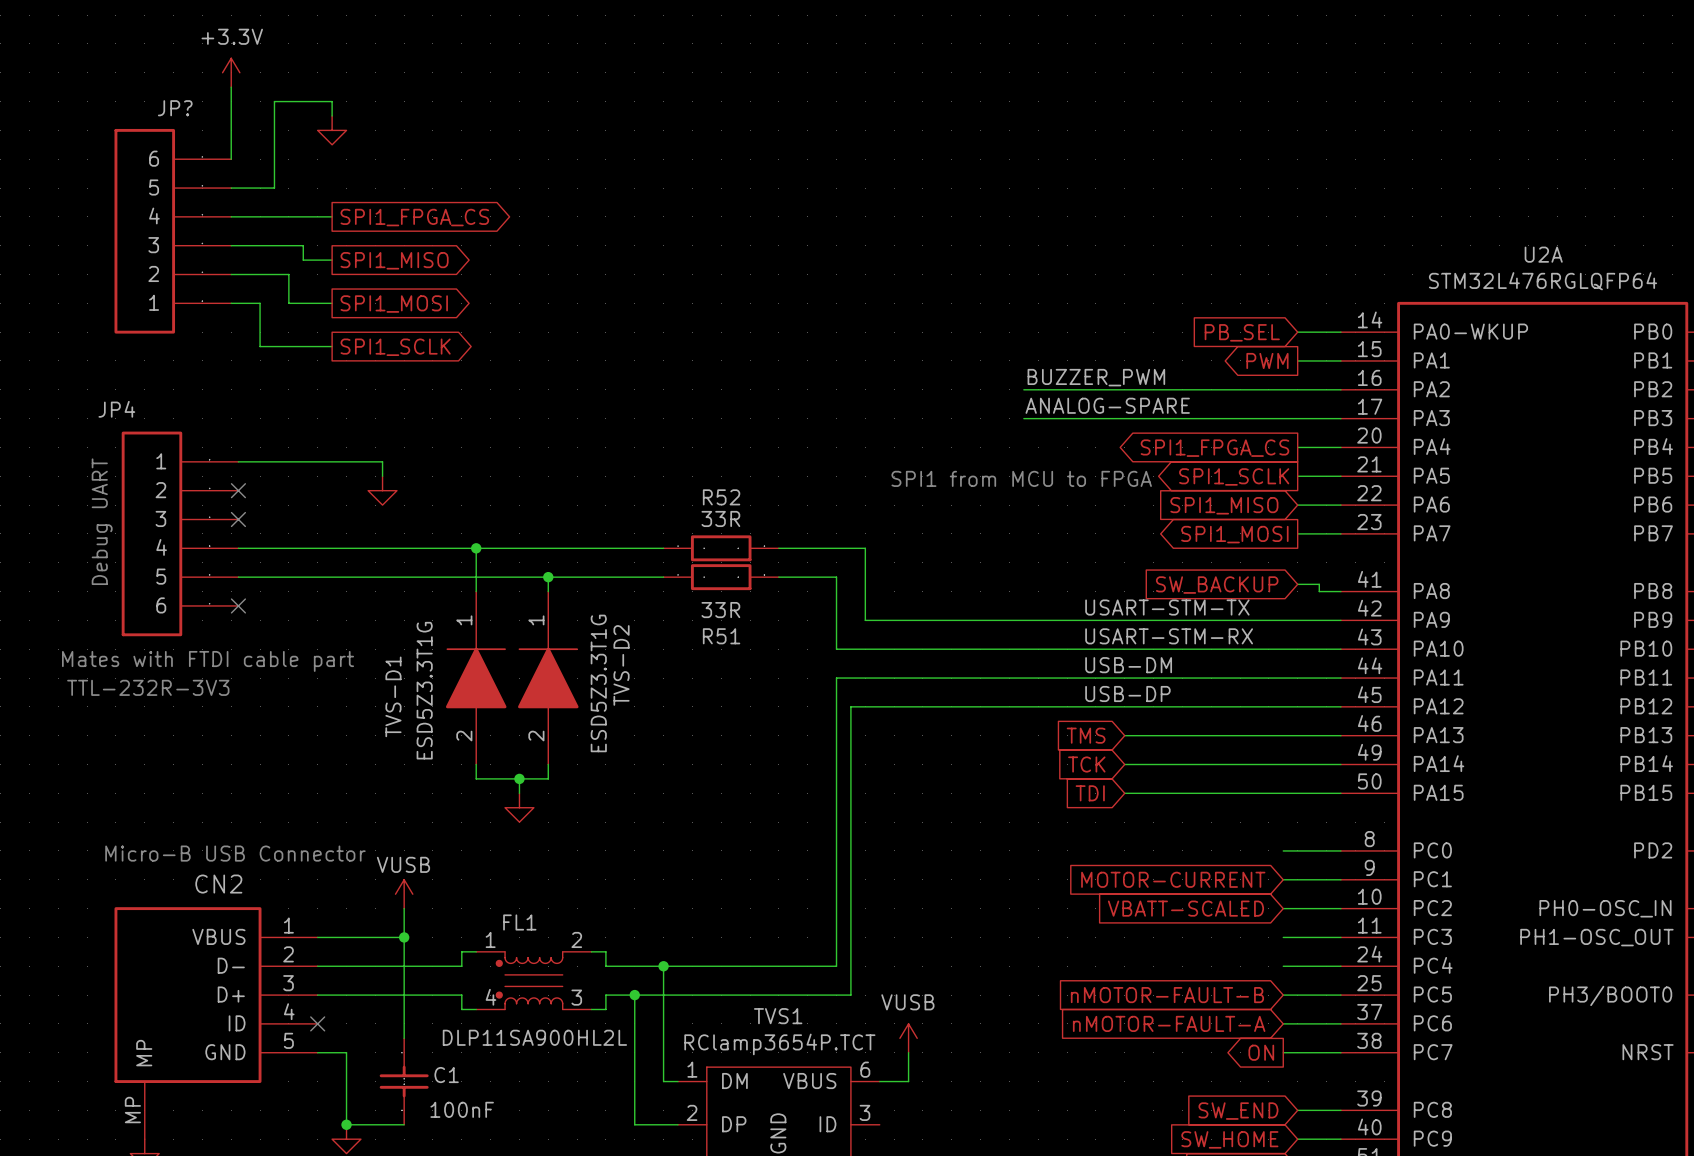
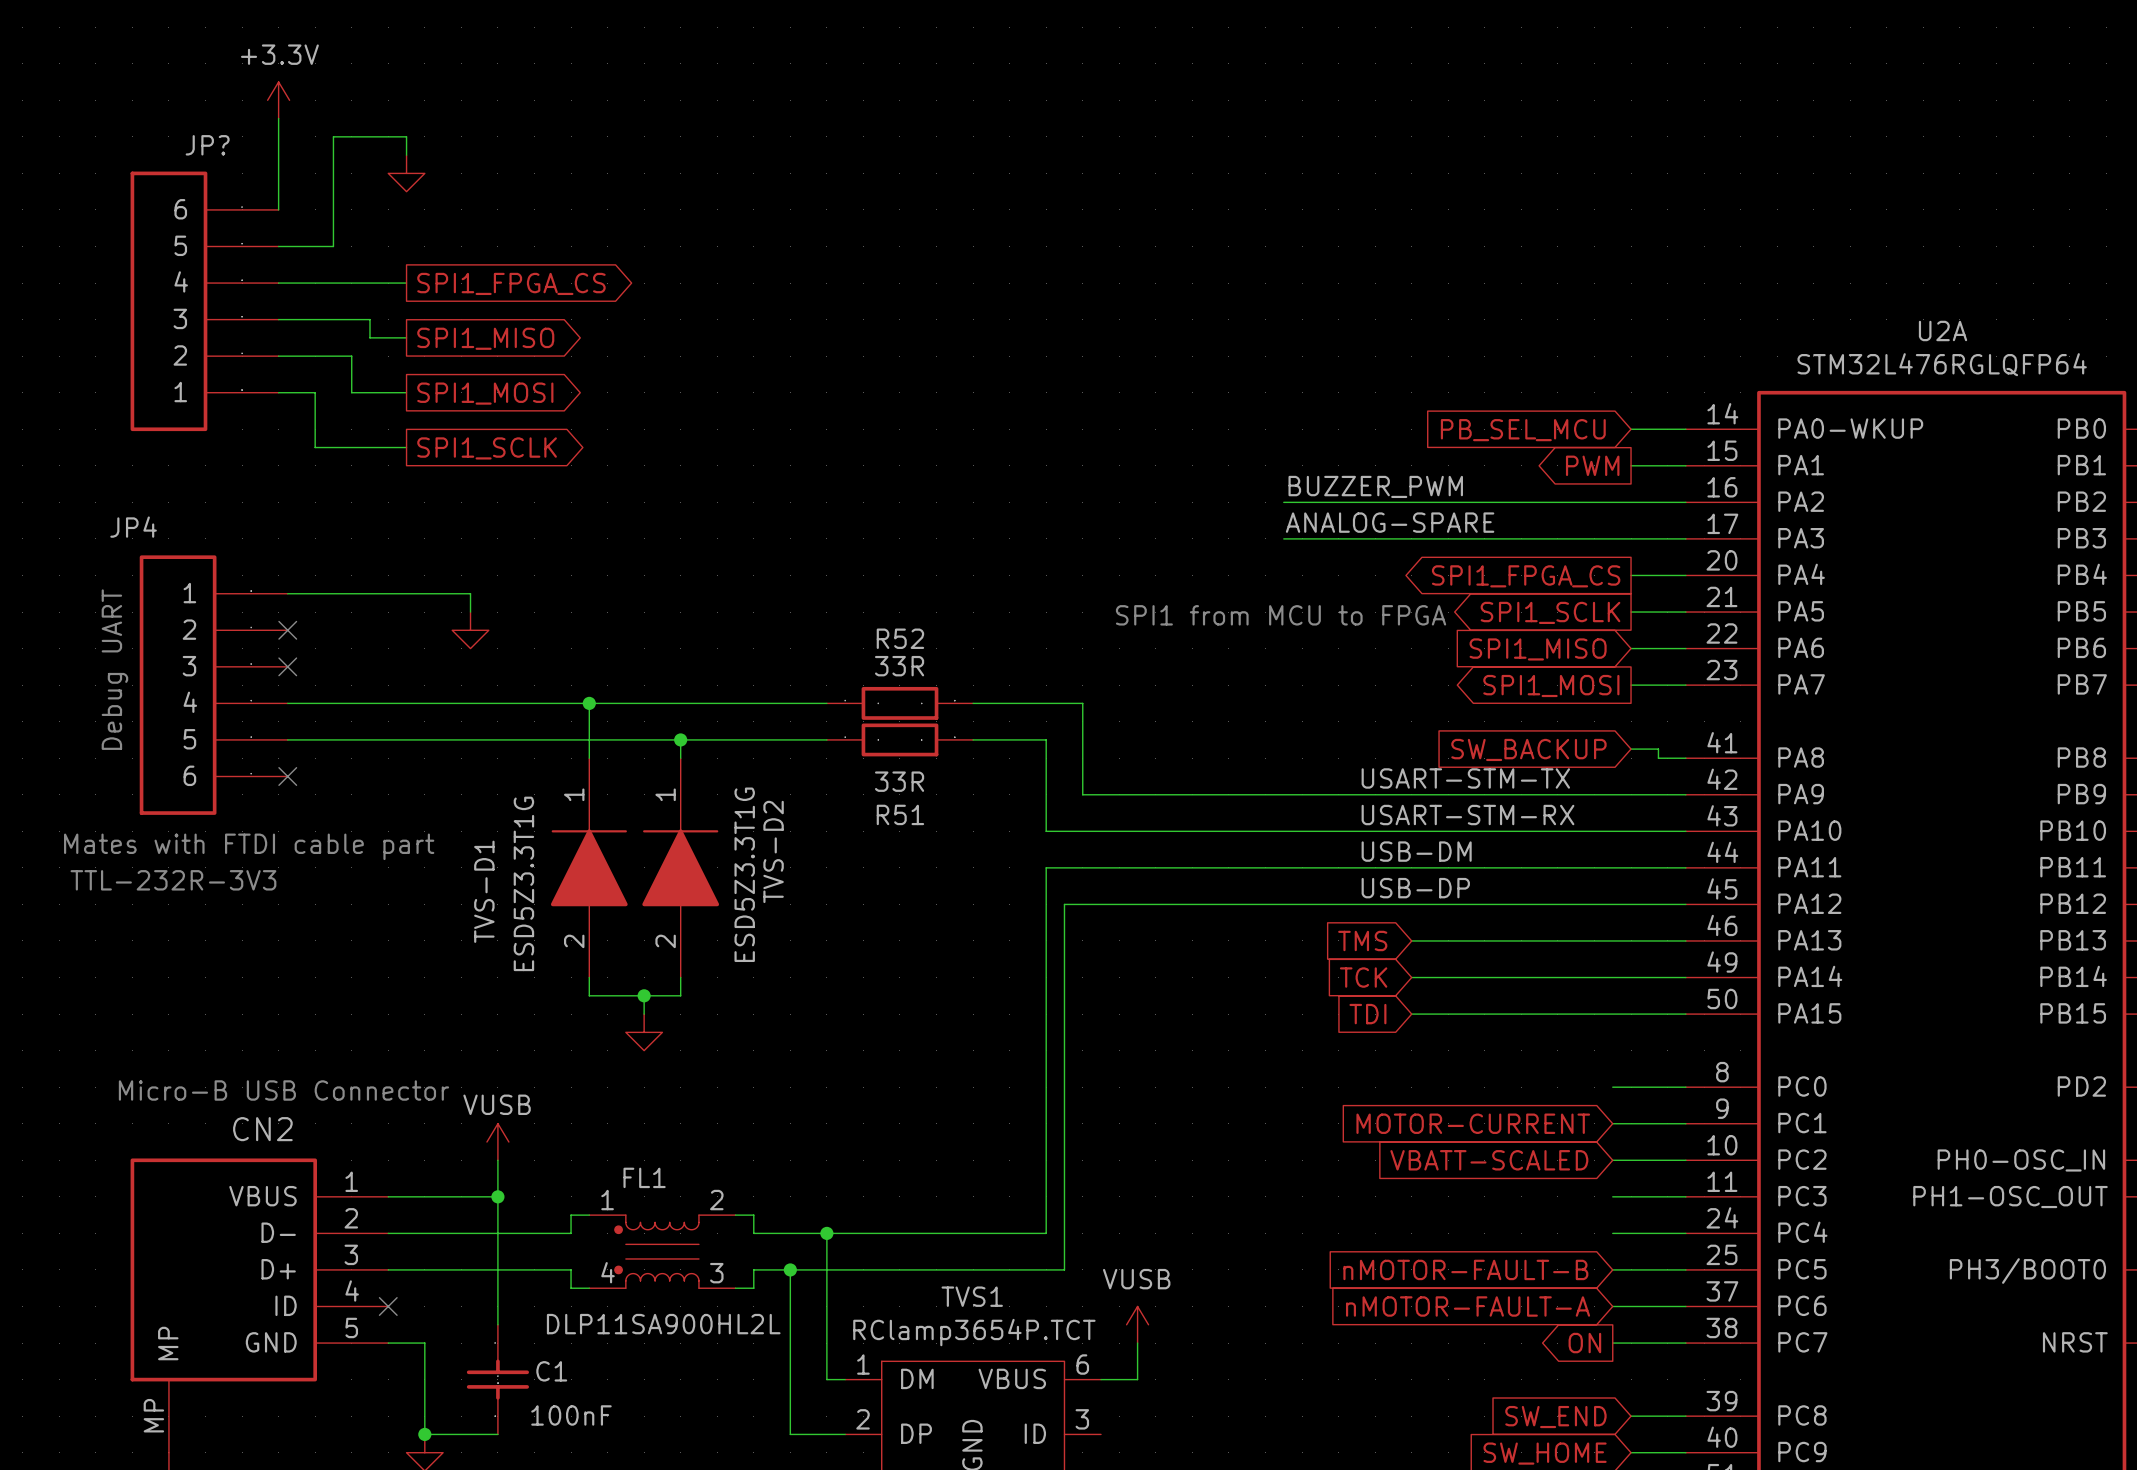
global label: PB_SEL (1242, 332) -> PB_SEL_MCU (1523, 430)

